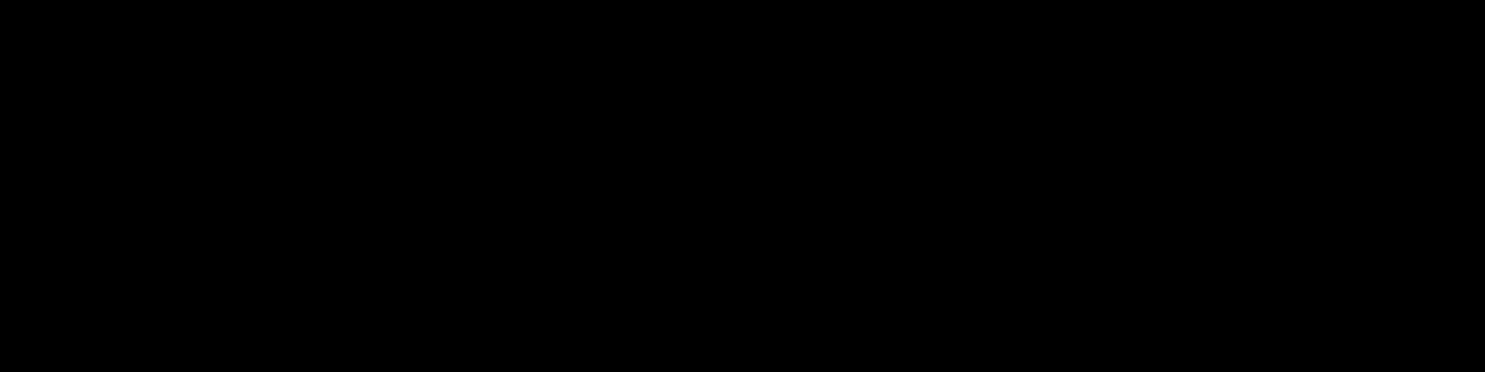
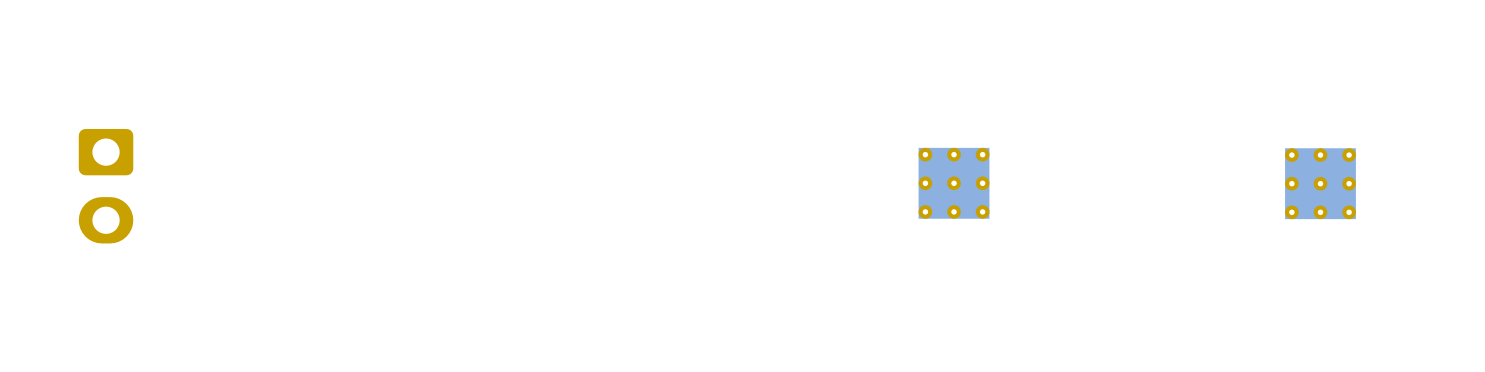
part: none -> (954, 183)
part: none -> (1320, 183)
part: none -> (106, 186)

